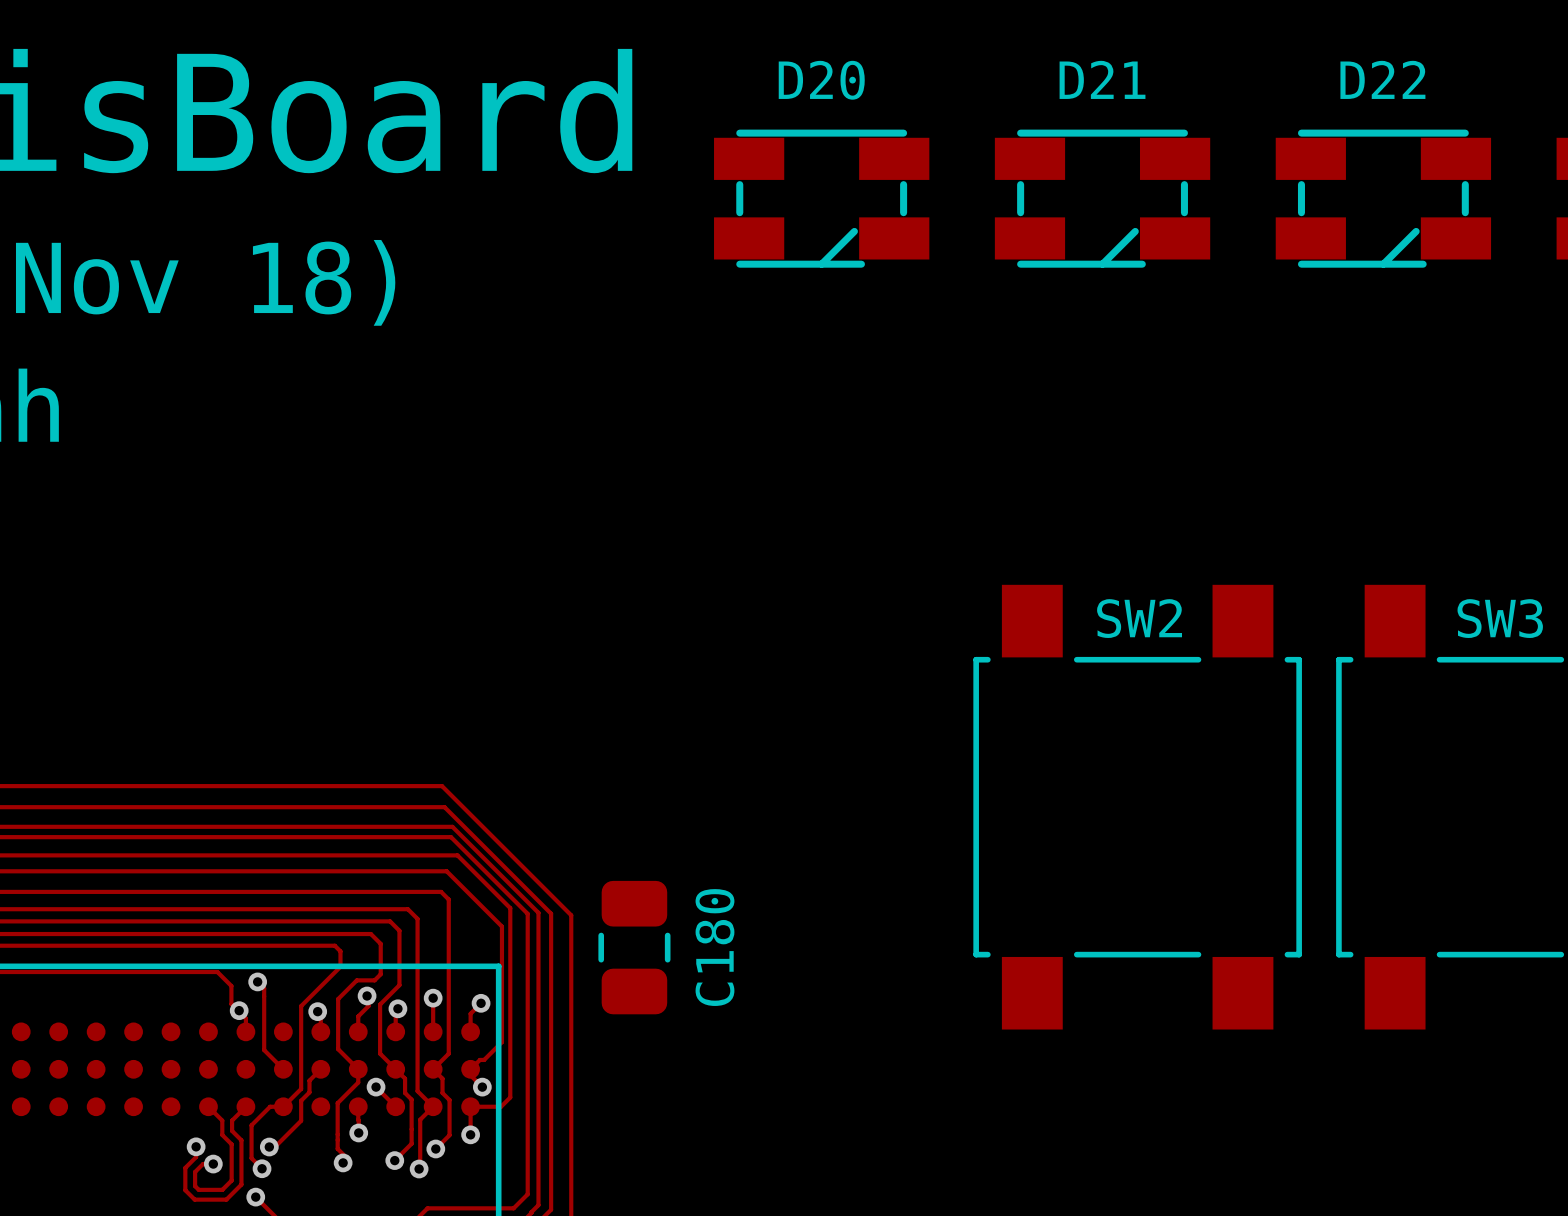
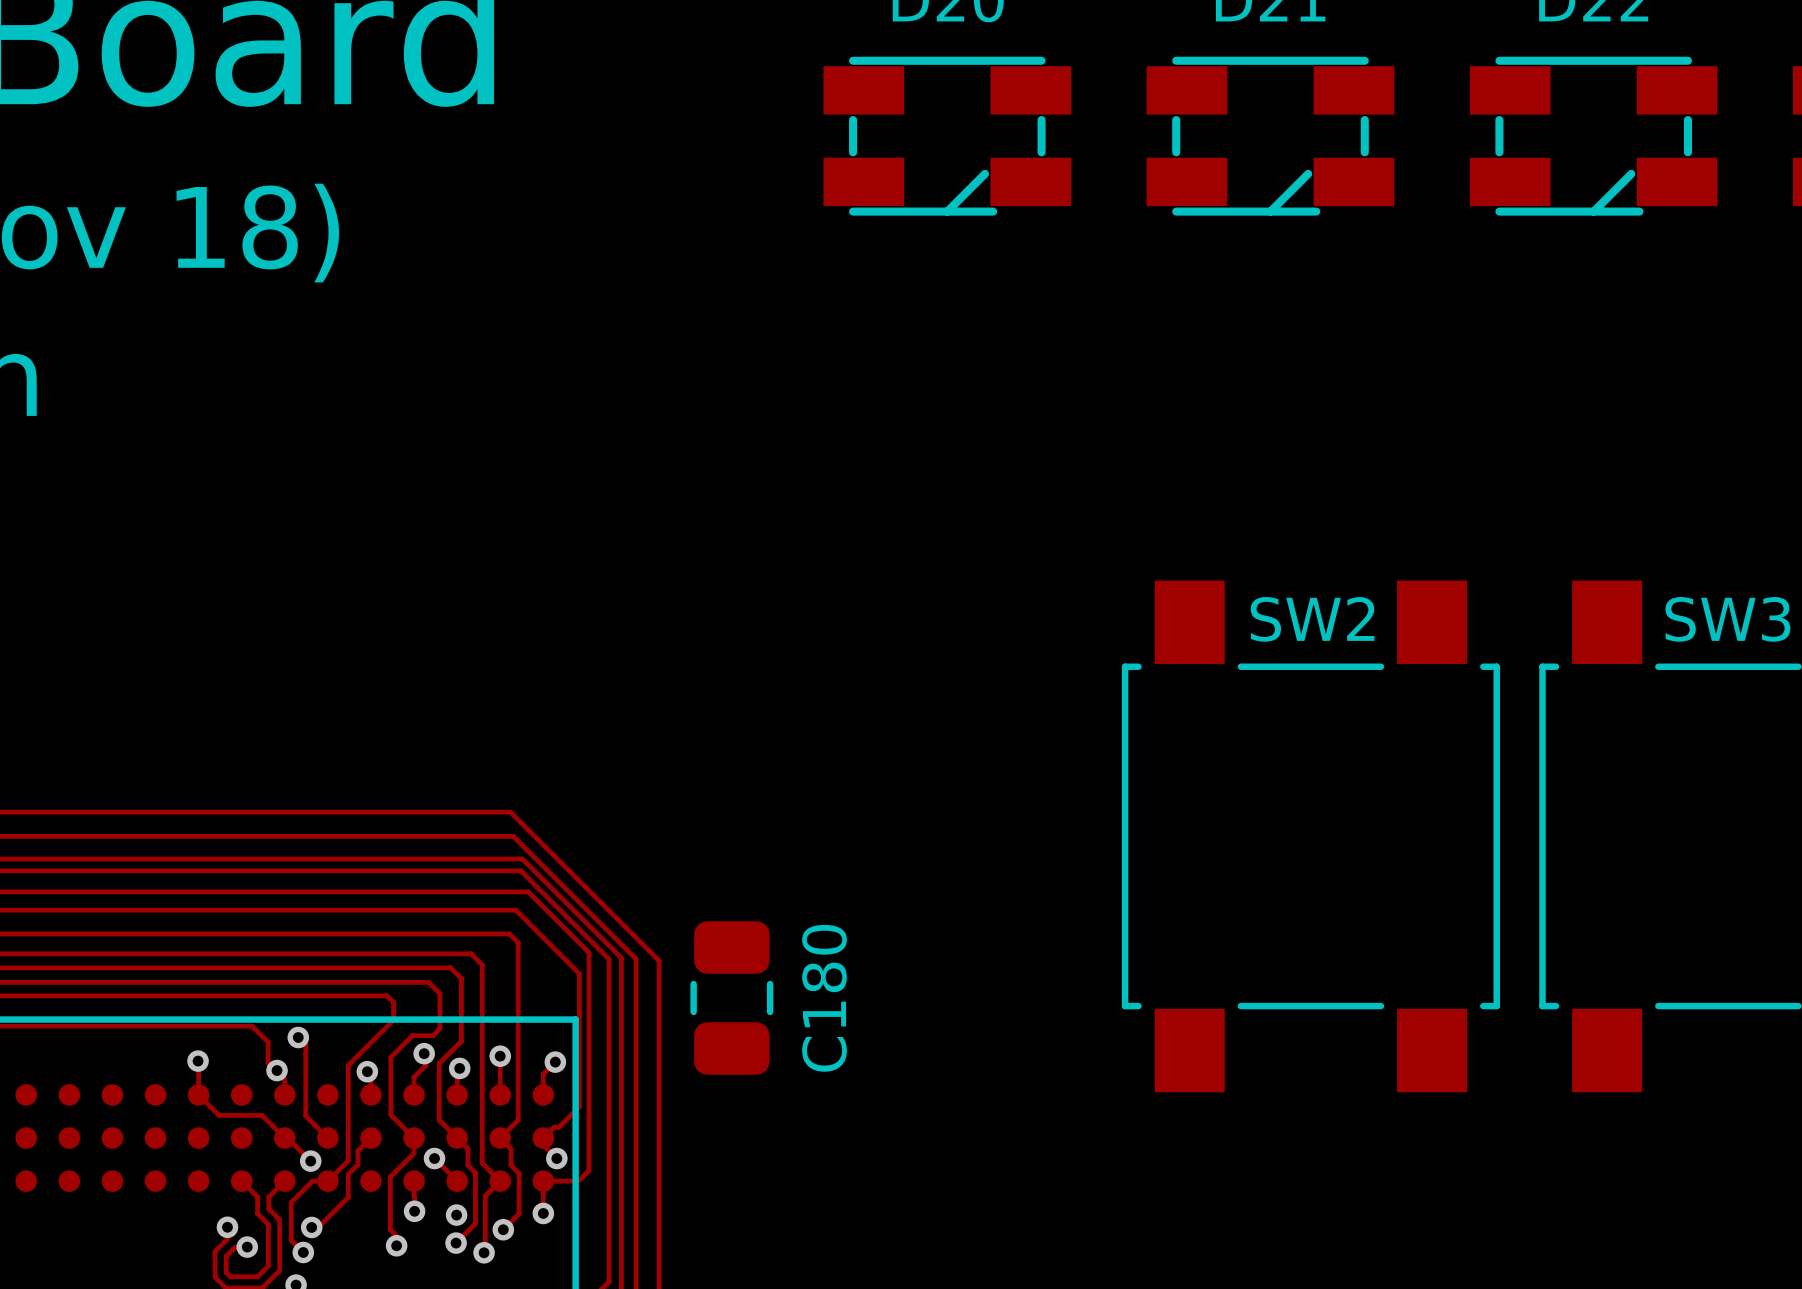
via: none -> (198, 1061)
track: none -> (198, 1061) (198, 1094) (219, 1115) (262, 1115) (310, 1161)
via: none -> (310, 1161)
via: none -> (456, 1215)

